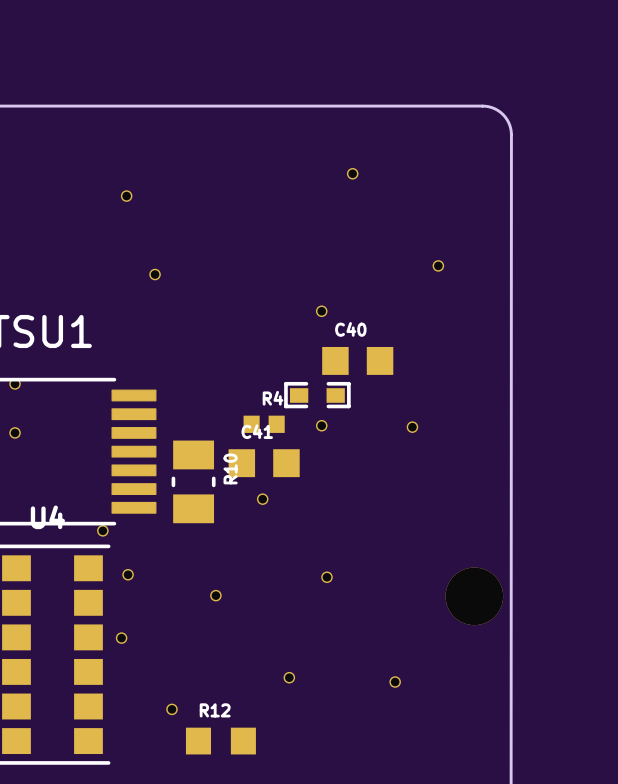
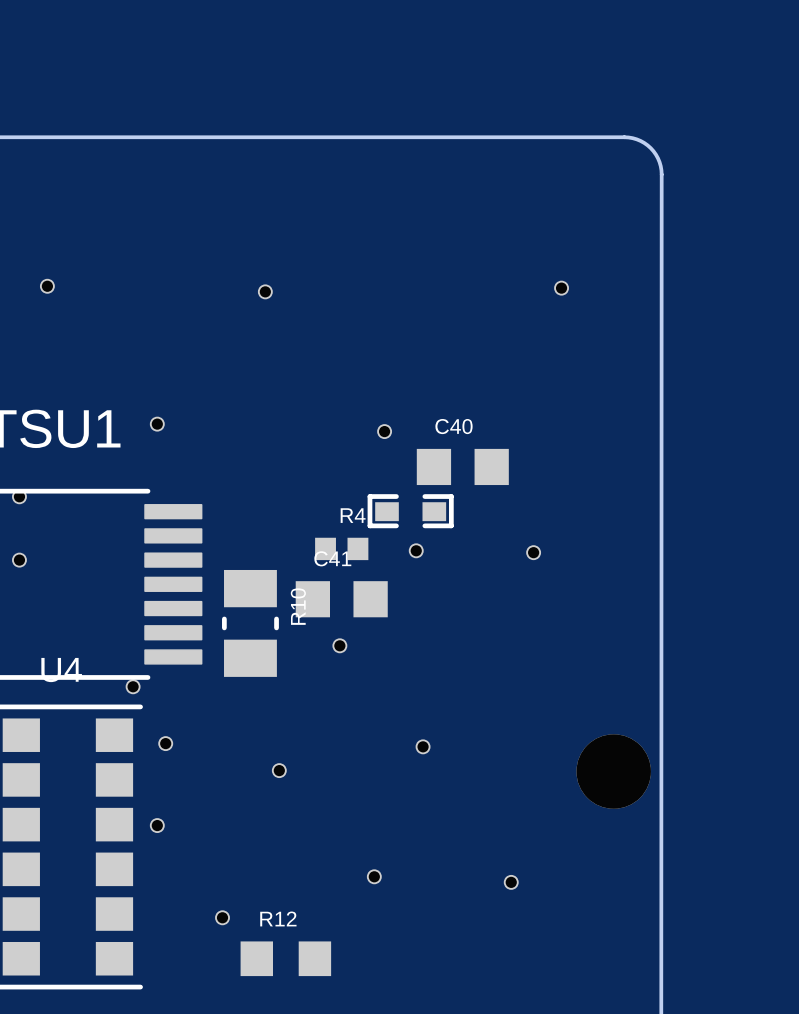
part: (352, 173) -> none
part: (126, 196) -> none
part: none -> (47, 286)
part: none -> (265, 291)
part position: (438, 265) -> (561, 288)
part: (155, 274) -> none
part position: (321, 311) -> (384, 431)
part: none -> (157, 424)

